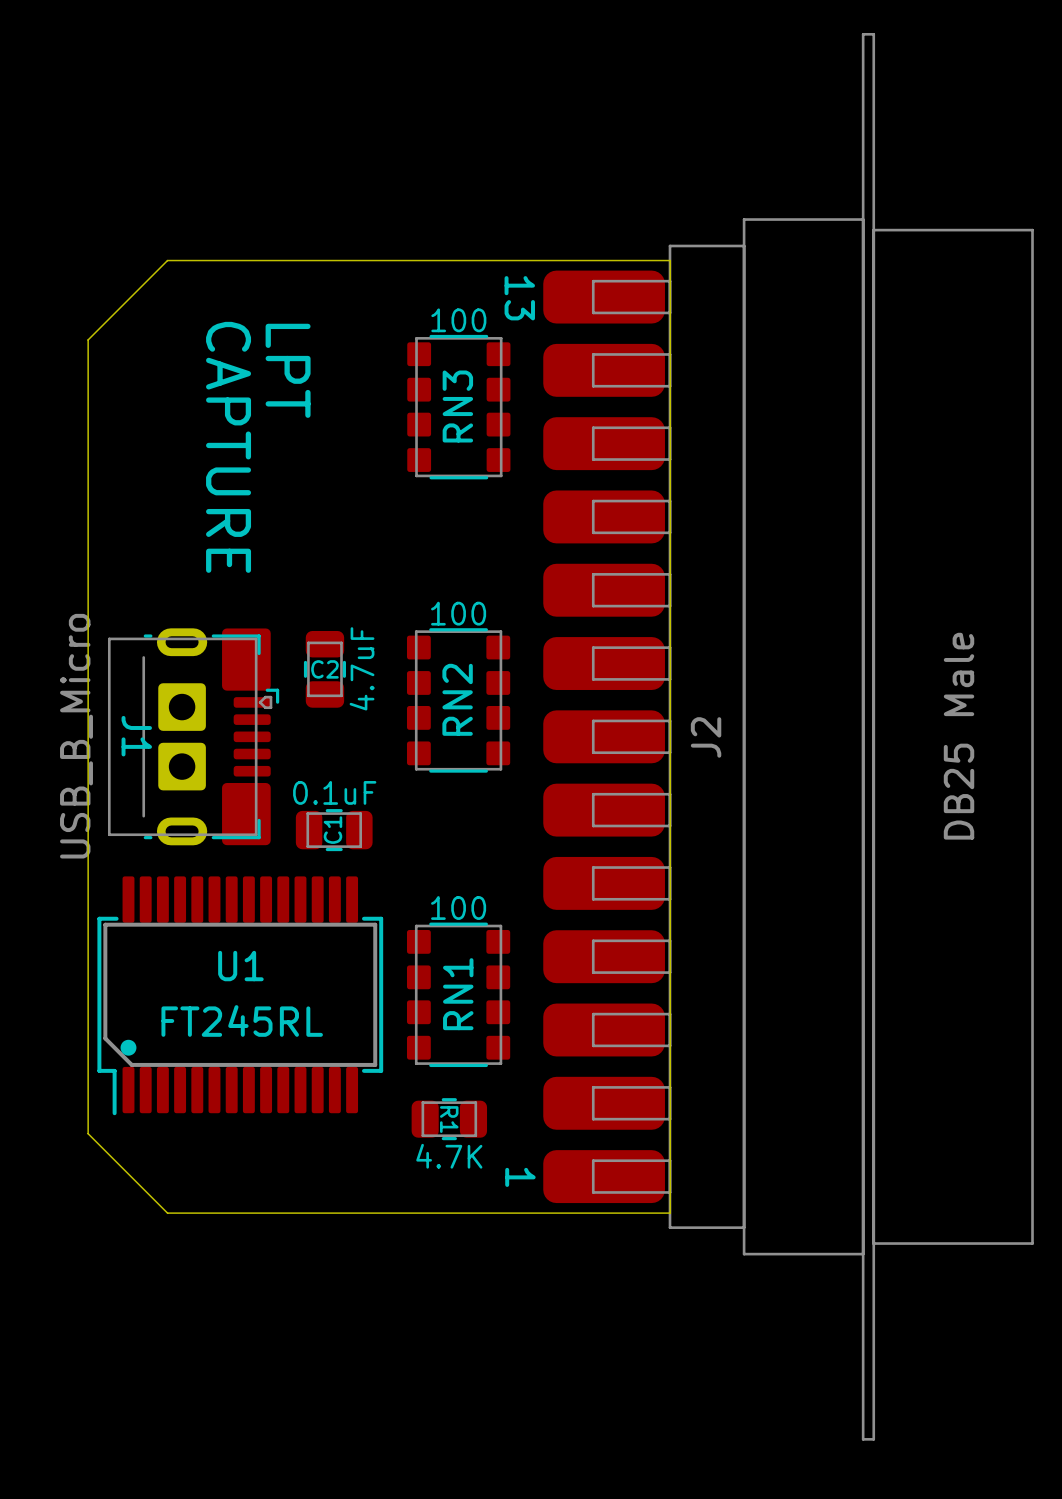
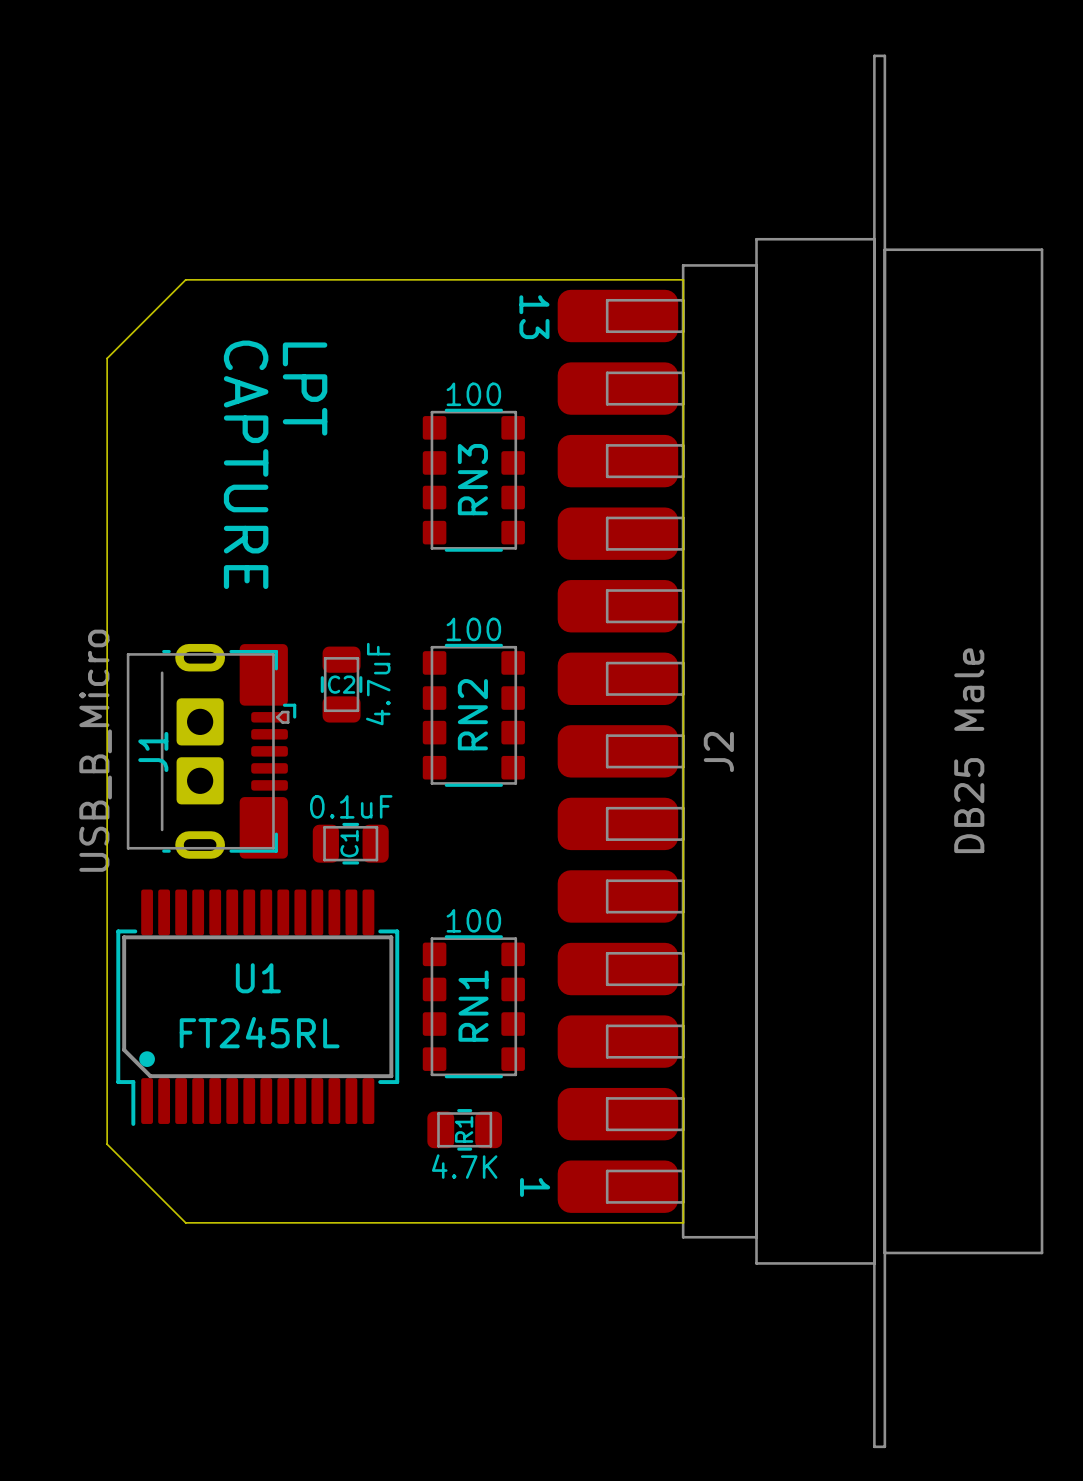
RN3 position: (458, 407) -> (473, 480)
J1 name rotation: 0° (136, 736) -> 180° (153, 751)
R1 name rotation: 0° (449, 1119) -> 180° (464, 1129)

